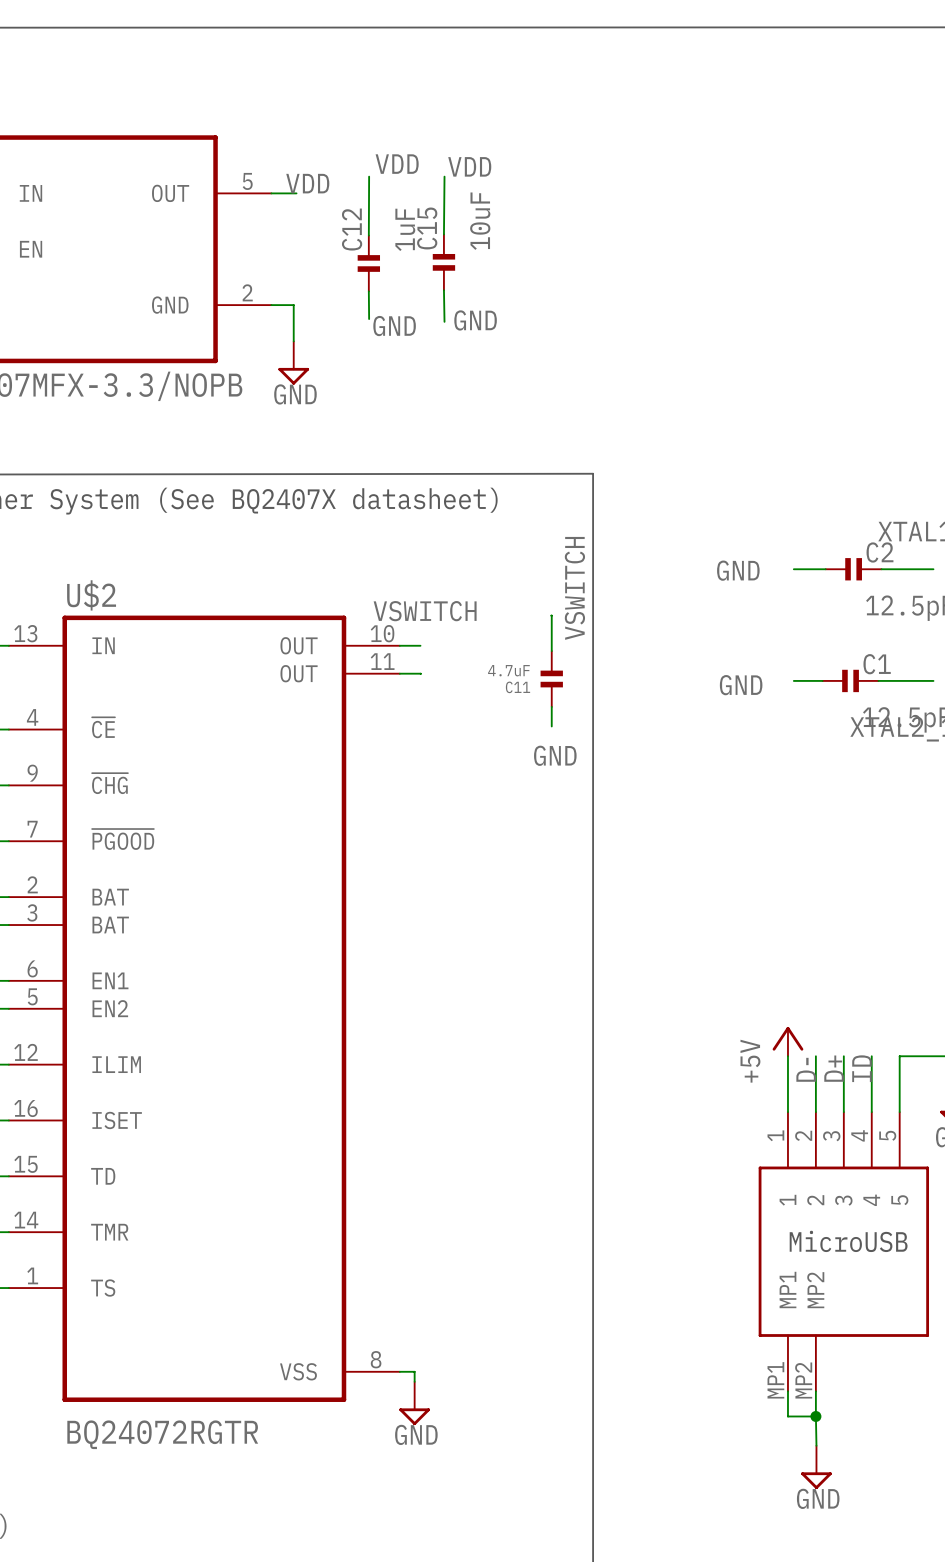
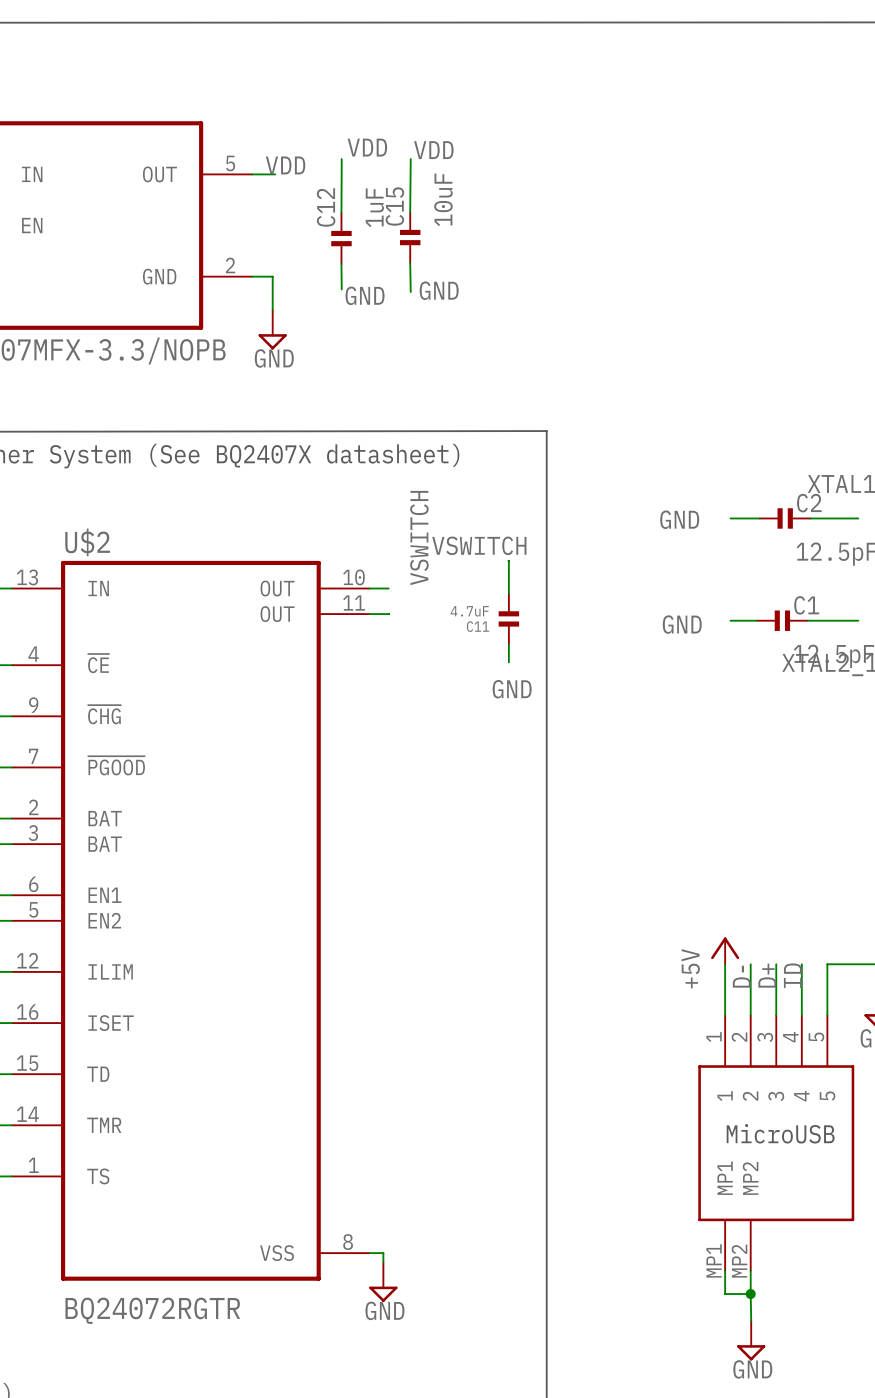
label rotation: 0° (574, 588) -> 90° clockwise (479, 545)
label rotation: 0° (425, 611) -> 90° counterclockwise (419, 538)

